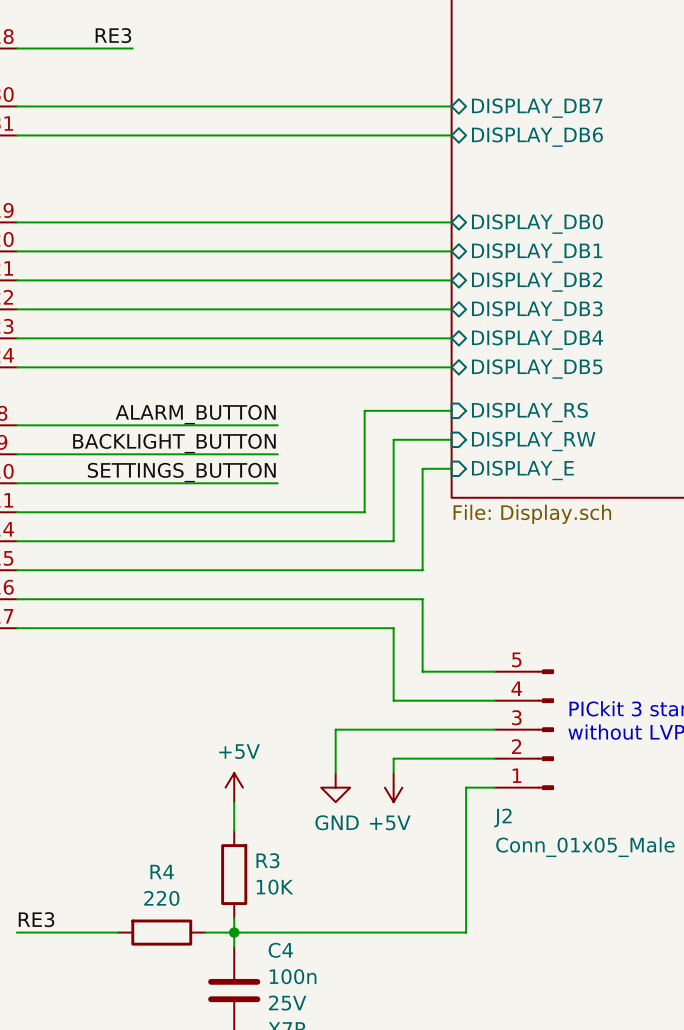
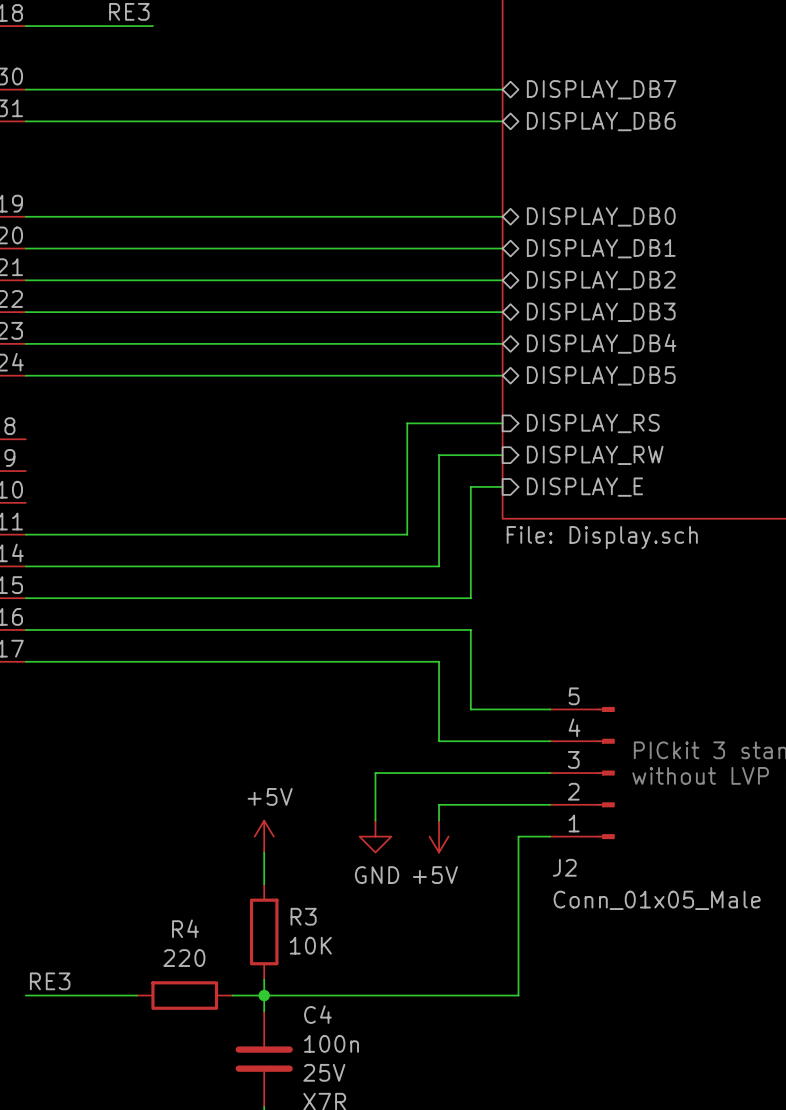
label: ALARM_BUTTON (195, 414) -> none
wire: (16, 425) (277, 425) -> none
label: BACKLIGHT_BUTTON (174, 443) -> none
wire: (16, 454) (277, 454) -> none
label: SETTINGS_BUTTON (181, 472) -> none
wire: (16, 483) (277, 483) -> none

